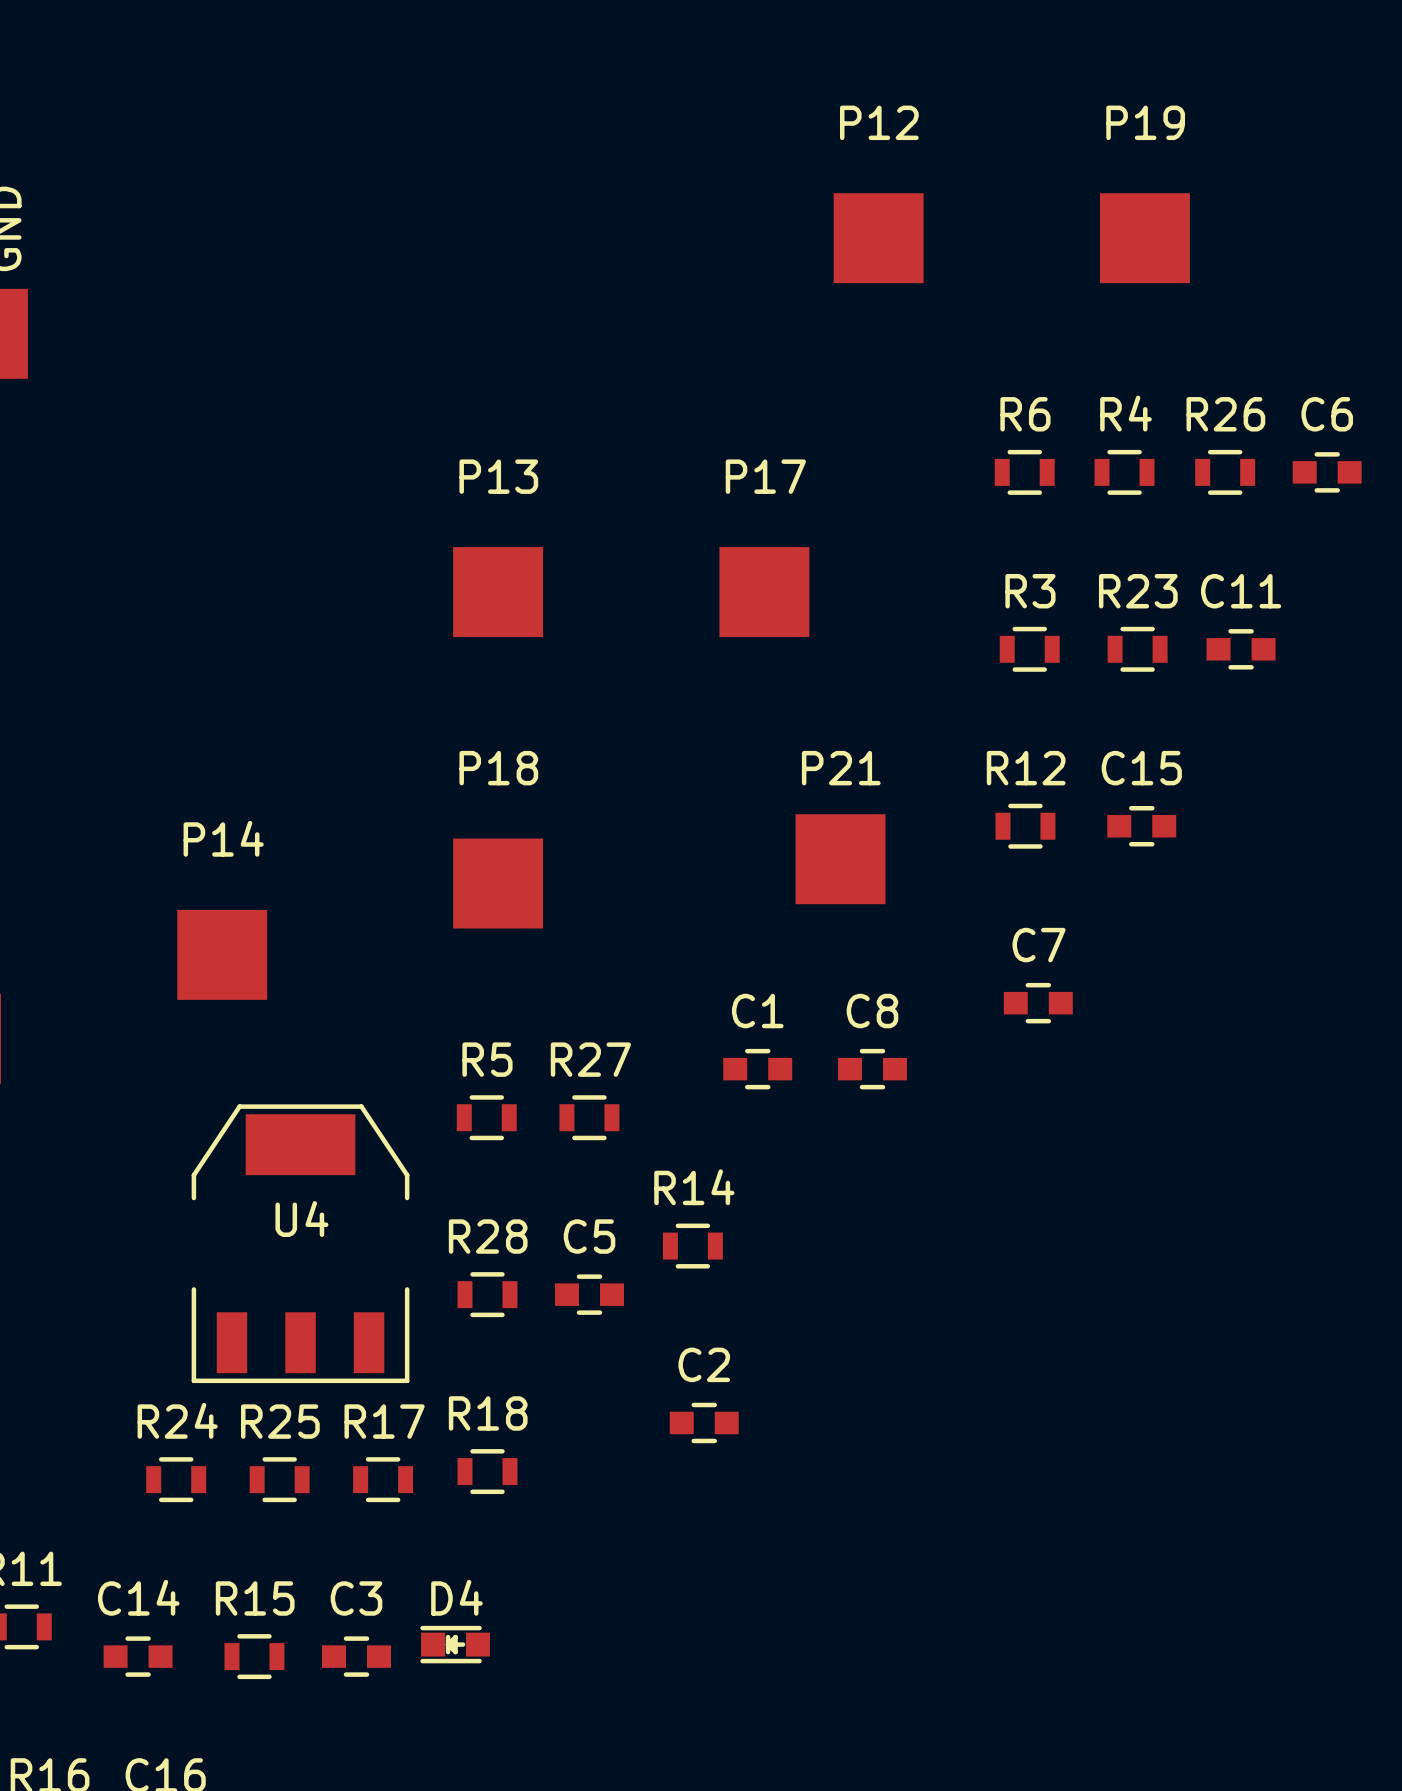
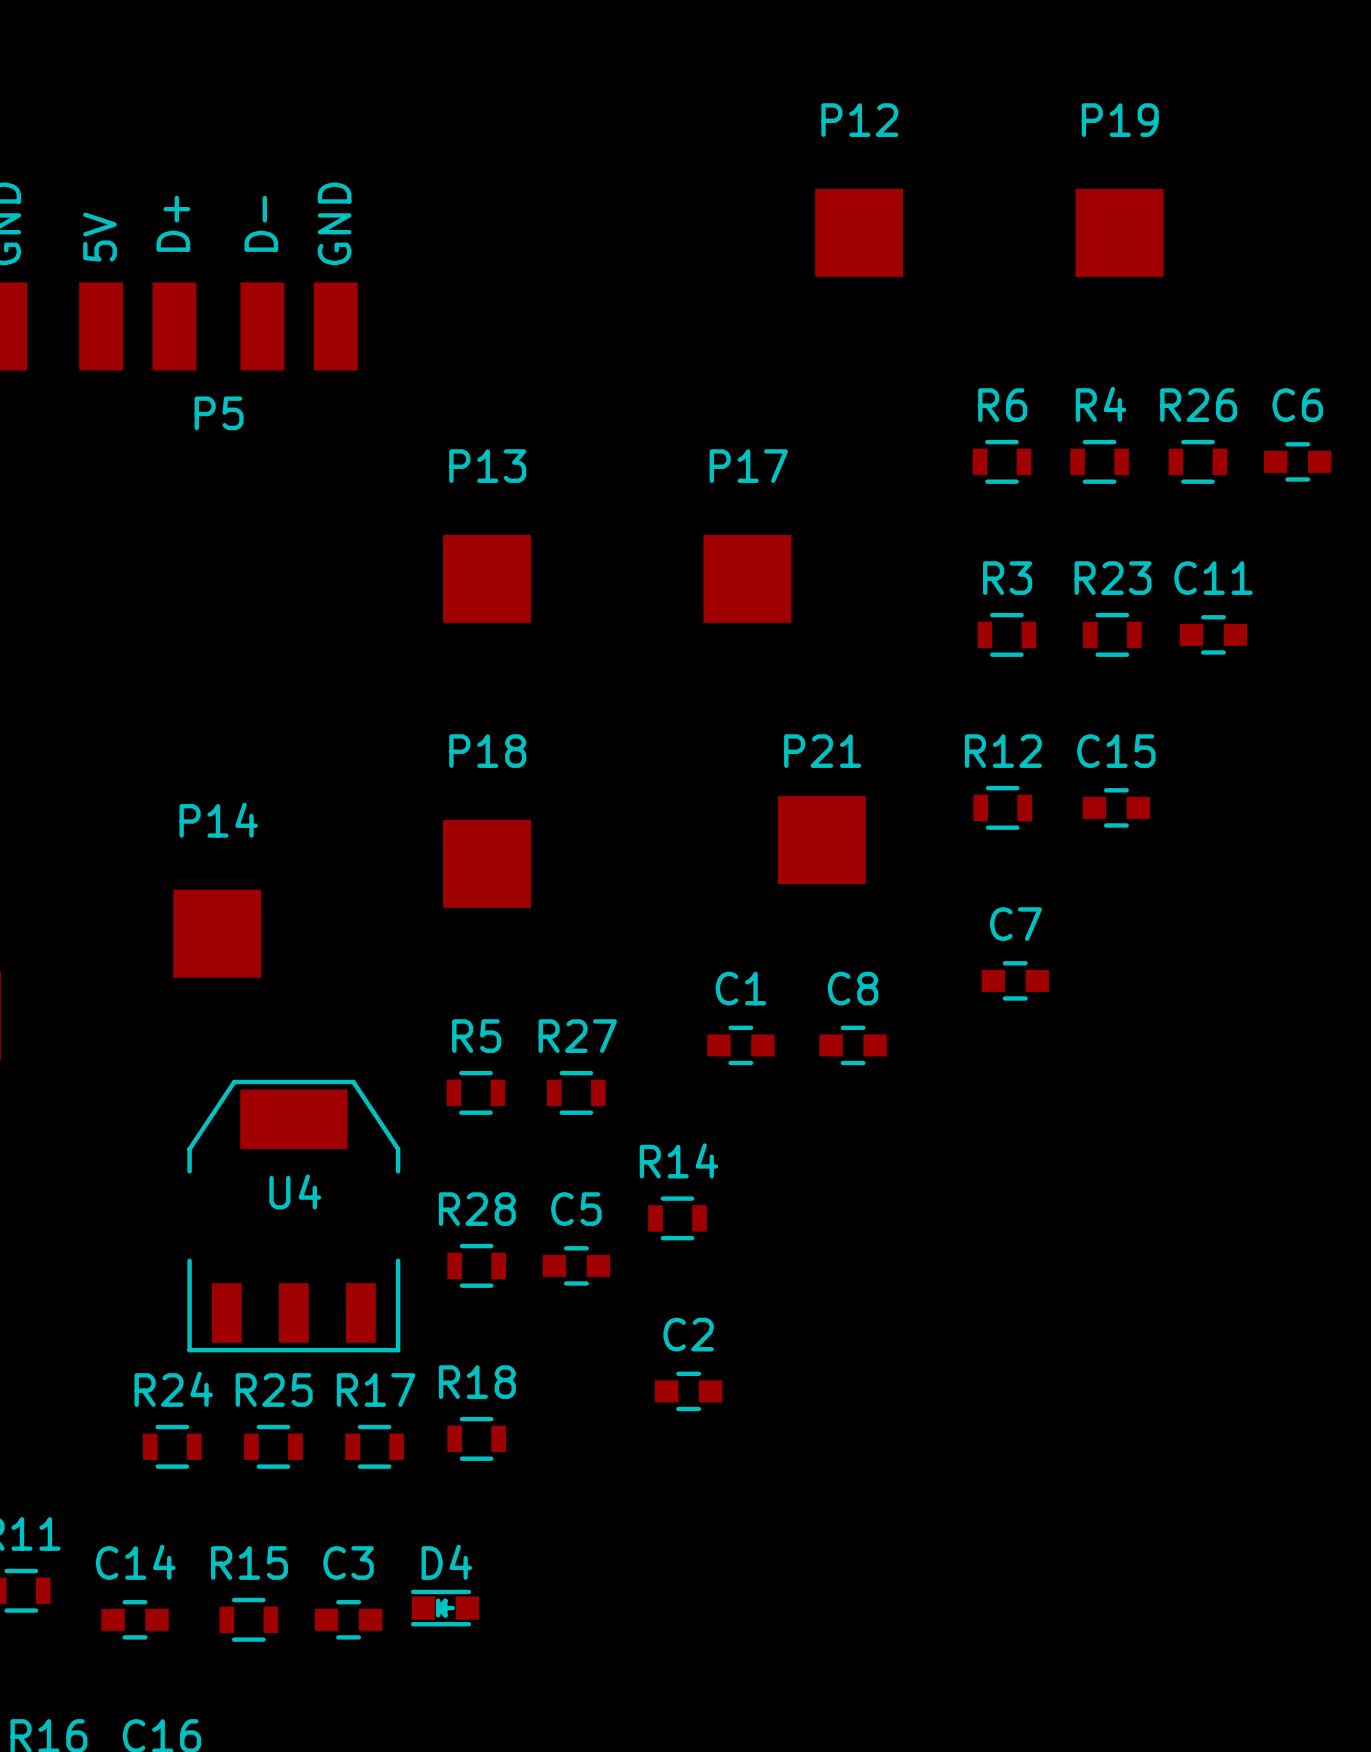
P5: none -> (218, 326)

